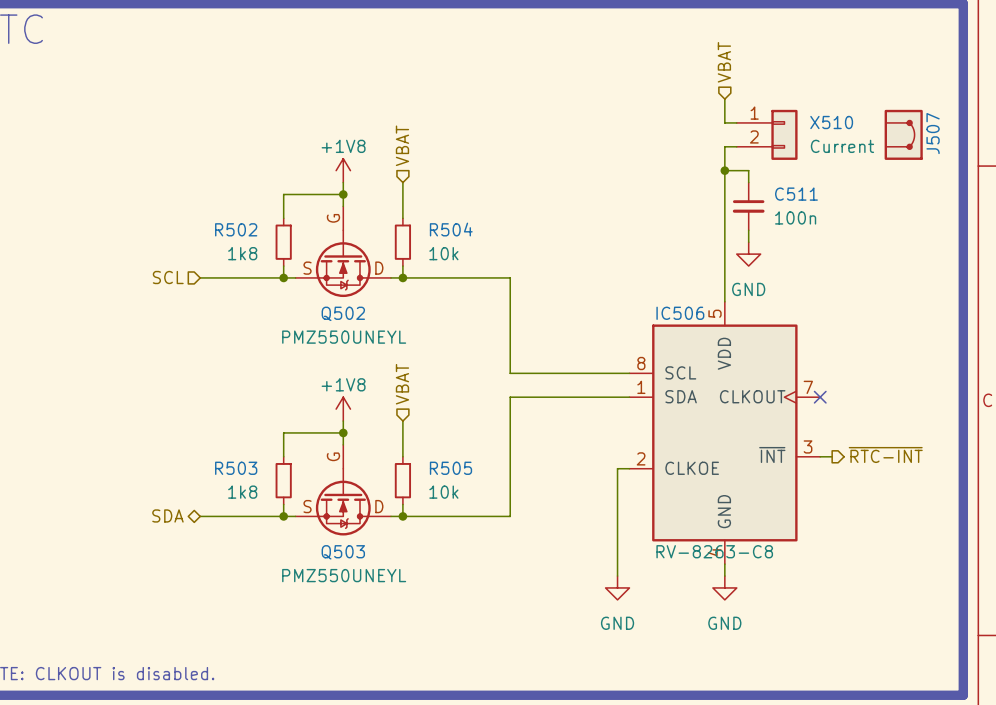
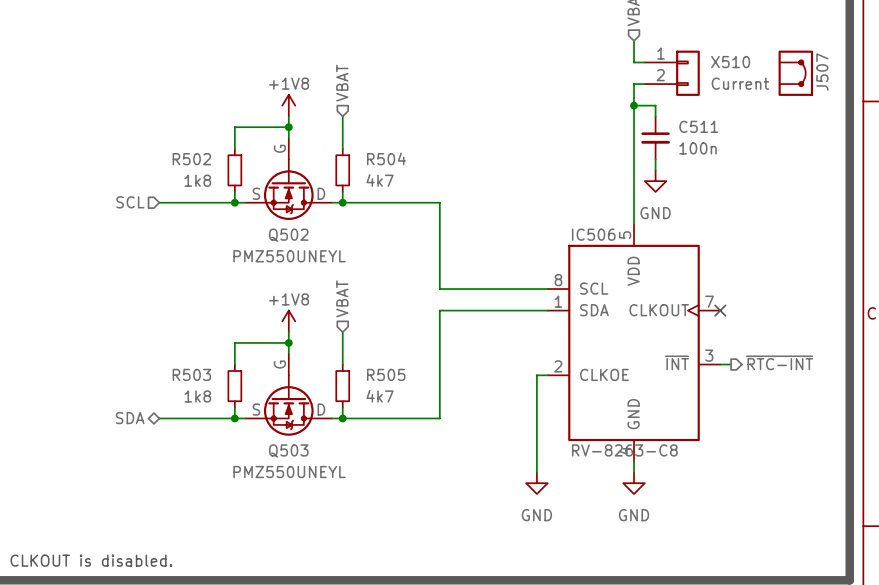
R504 value: 10k (443, 253) -> 4k7 (380, 180)
R505 value: 10k (443, 492) -> 4k7 (380, 396)

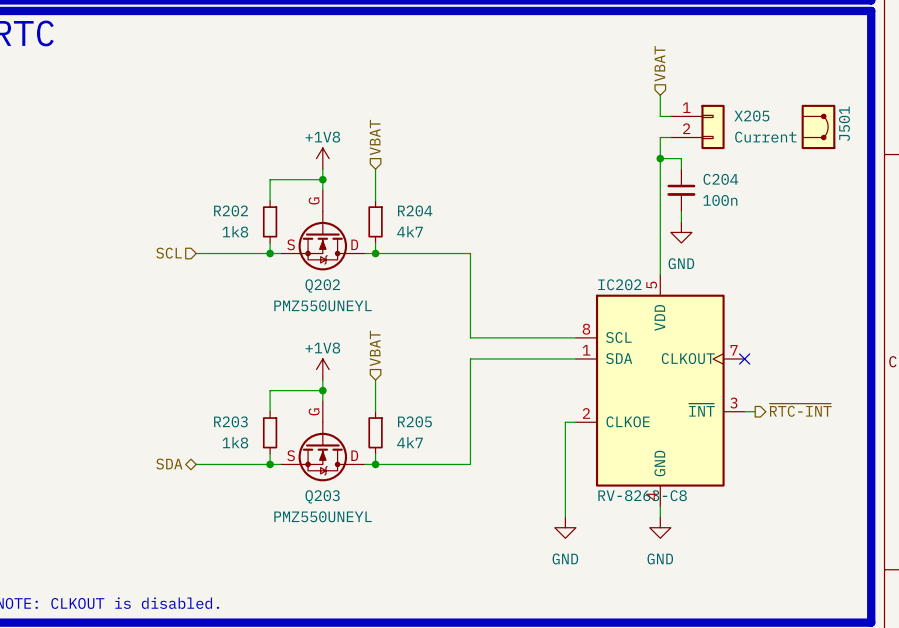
X510 name: X510 (730, 62) -> X205 (751, 116)
J507 name: J507 (822, 72) -> J501 (844, 123)
C511 name: C511 (698, 126) -> C204 (720, 179)
R504 name: R504 (386, 158) -> R204 (415, 210)
R502 name: R502 (191, 159) -> R202 (231, 210)
IC506 name: IC506 (593, 234) -> IC202 (619, 284)
Q502 name: Q502 (288, 235) -> Q202 (322, 285)
R503 name: R503 (191, 374) -> R203 (230, 421)
R505 name: R505 (386, 374) -> R205 (414, 421)
Q503 name: Q503 (288, 450) -> Q203 (322, 496)

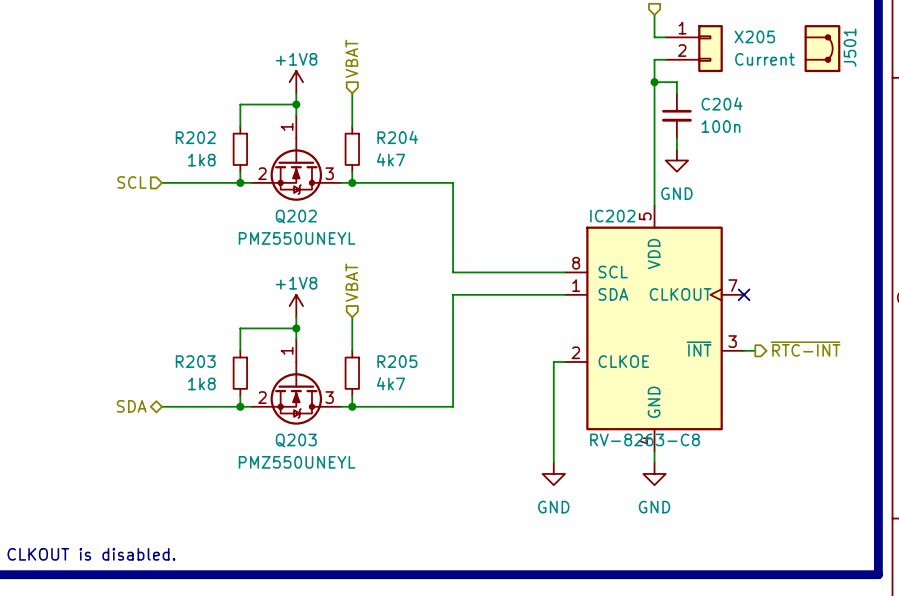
Q202 pin number: G (314, 200) -> 1 (287, 126)
Q202 pin number: S (291, 244) -> 2 (262, 173)
Q202 pin number: D (354, 244) -> 3 (329, 173)
Q203 pin number: G (314, 411) -> 1 (287, 350)
Q203 pin number: S (291, 455) -> 2 (262, 397)
Q203 pin number: D (354, 455) -> 3 (329, 397)

